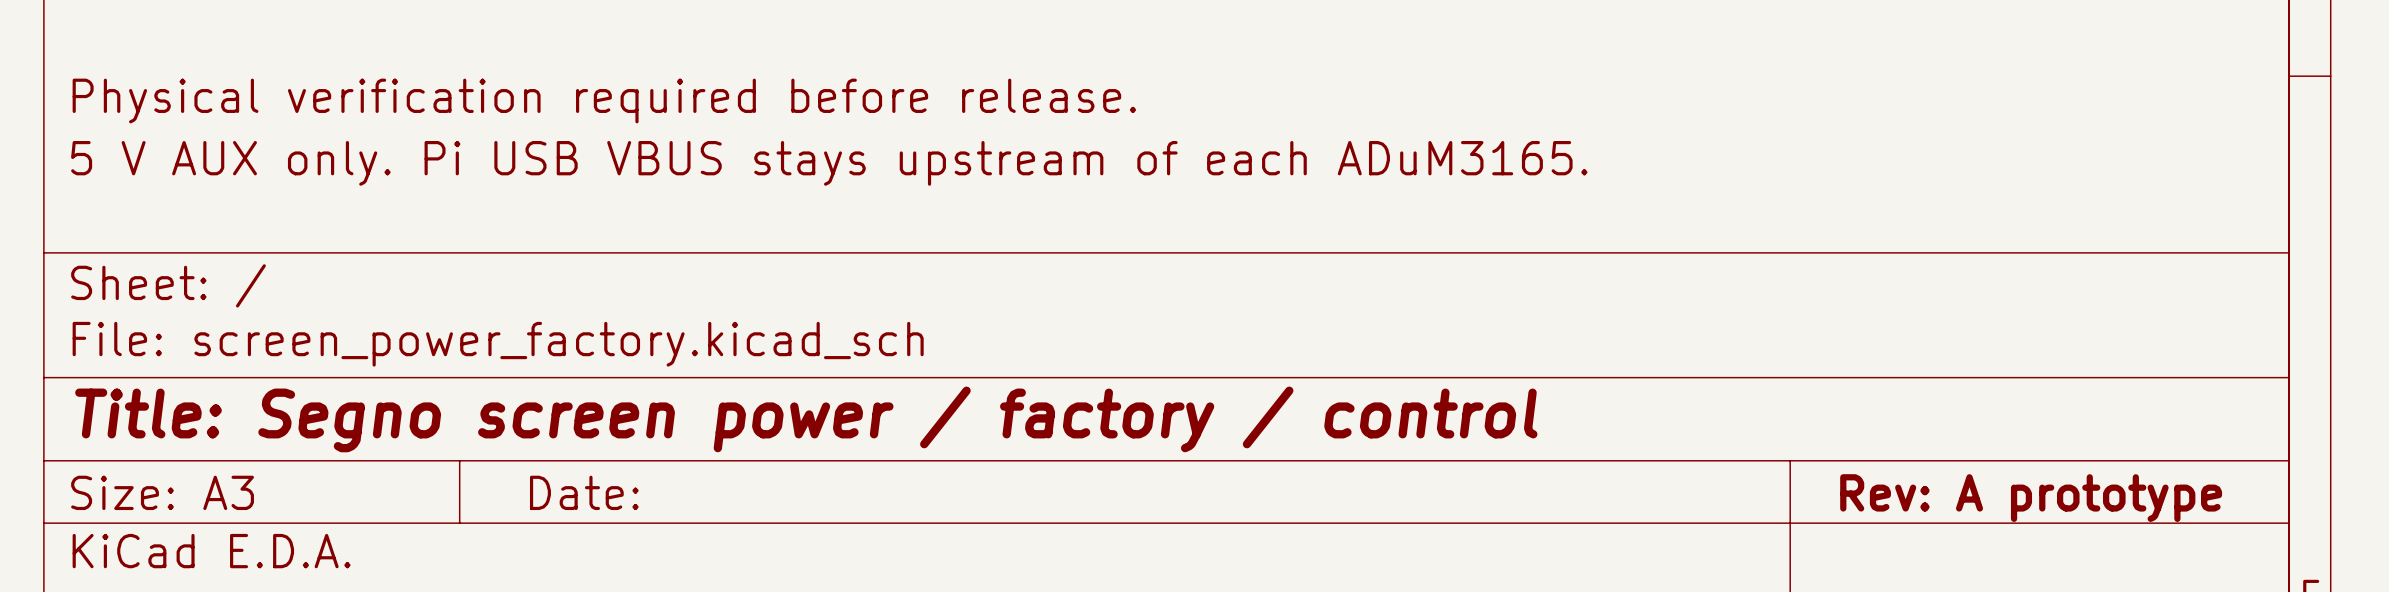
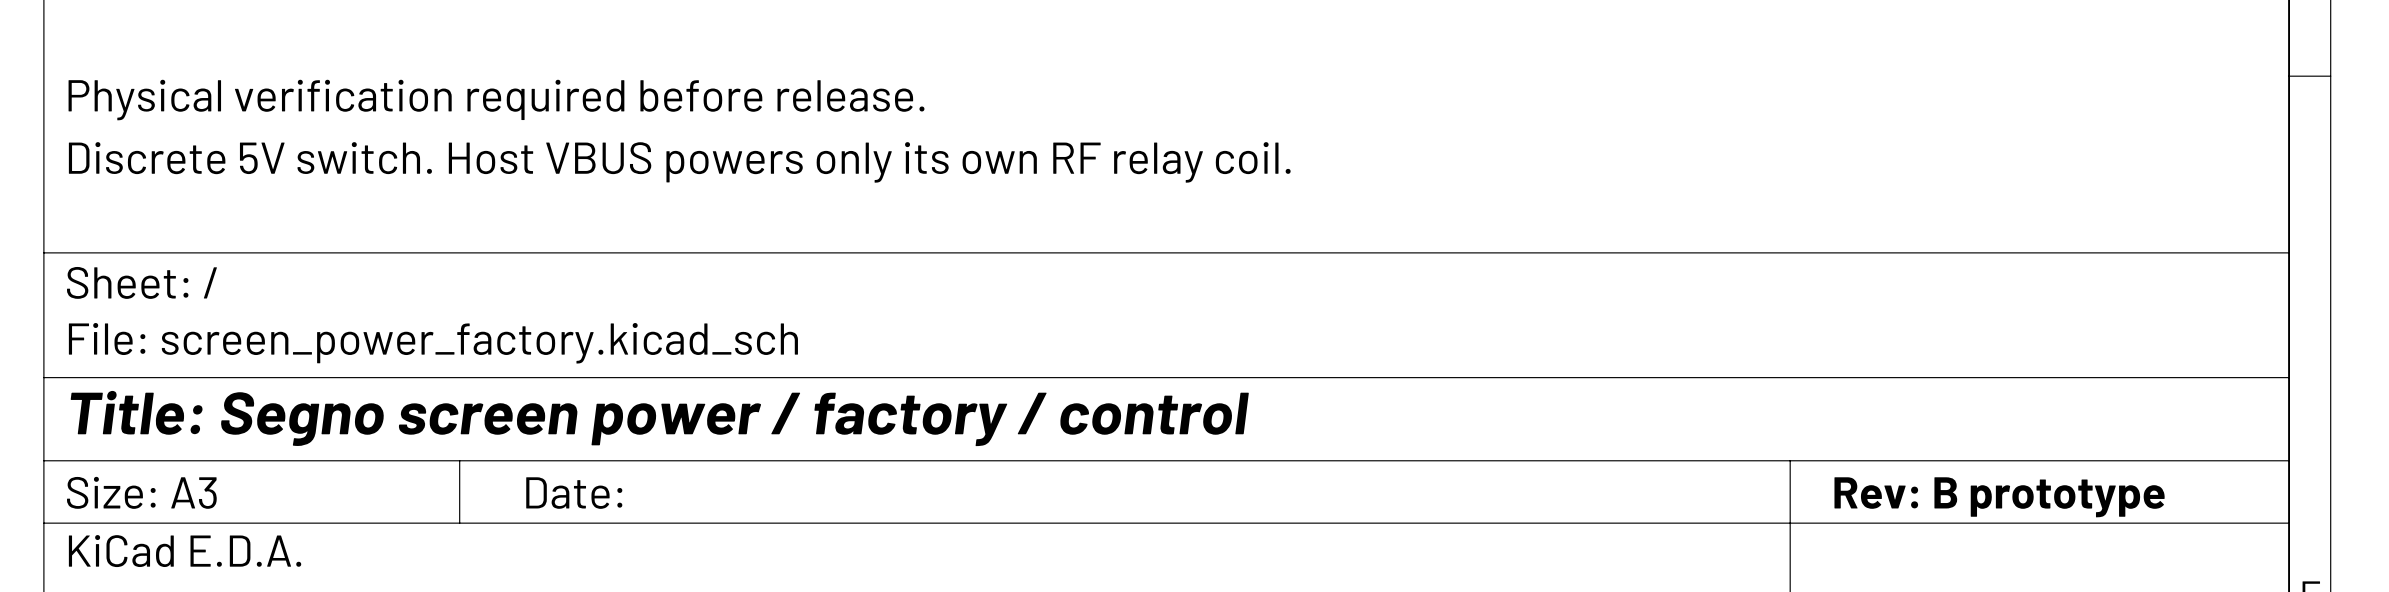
title block: 5 V AUX only. Pi USB VBUS stays upstream of each ADuM3165. (829, 163) -> Discrete 5V switch. Host VBUS powers only its own RF relay coil. (679, 162)
title block: Rev: A prototype (2031, 498) -> Rev: B prototype (1999, 497)

